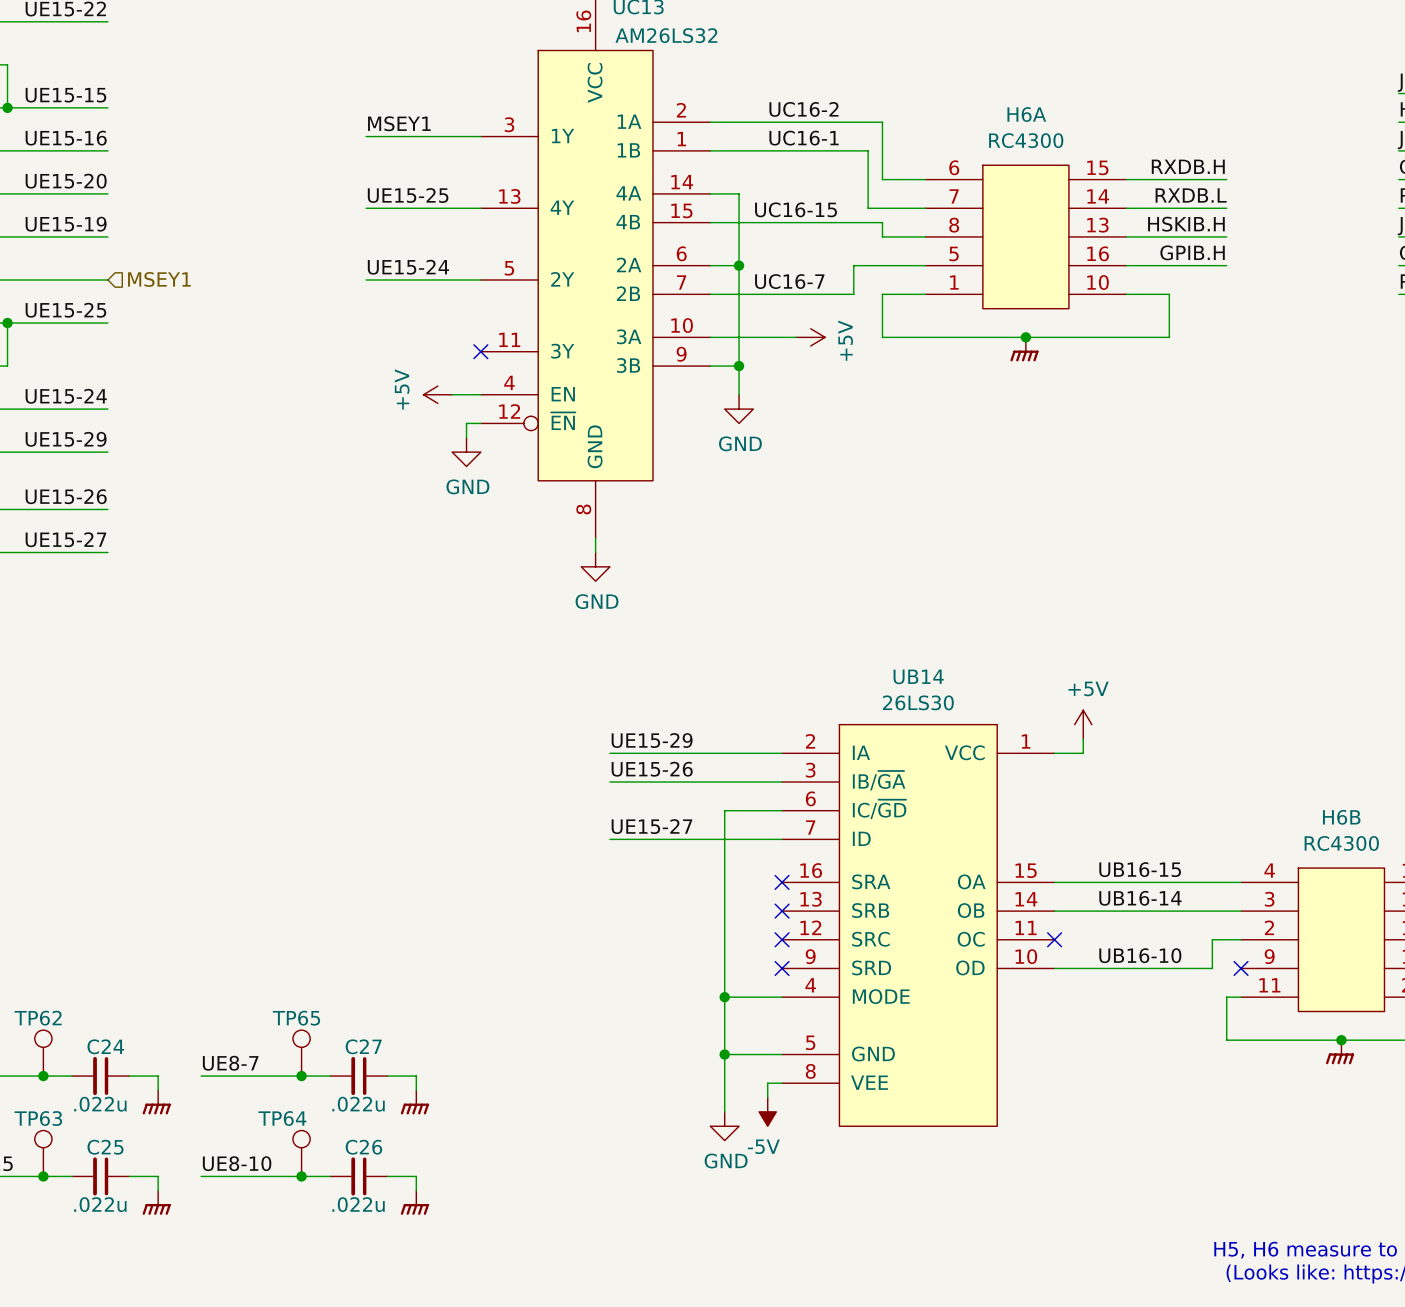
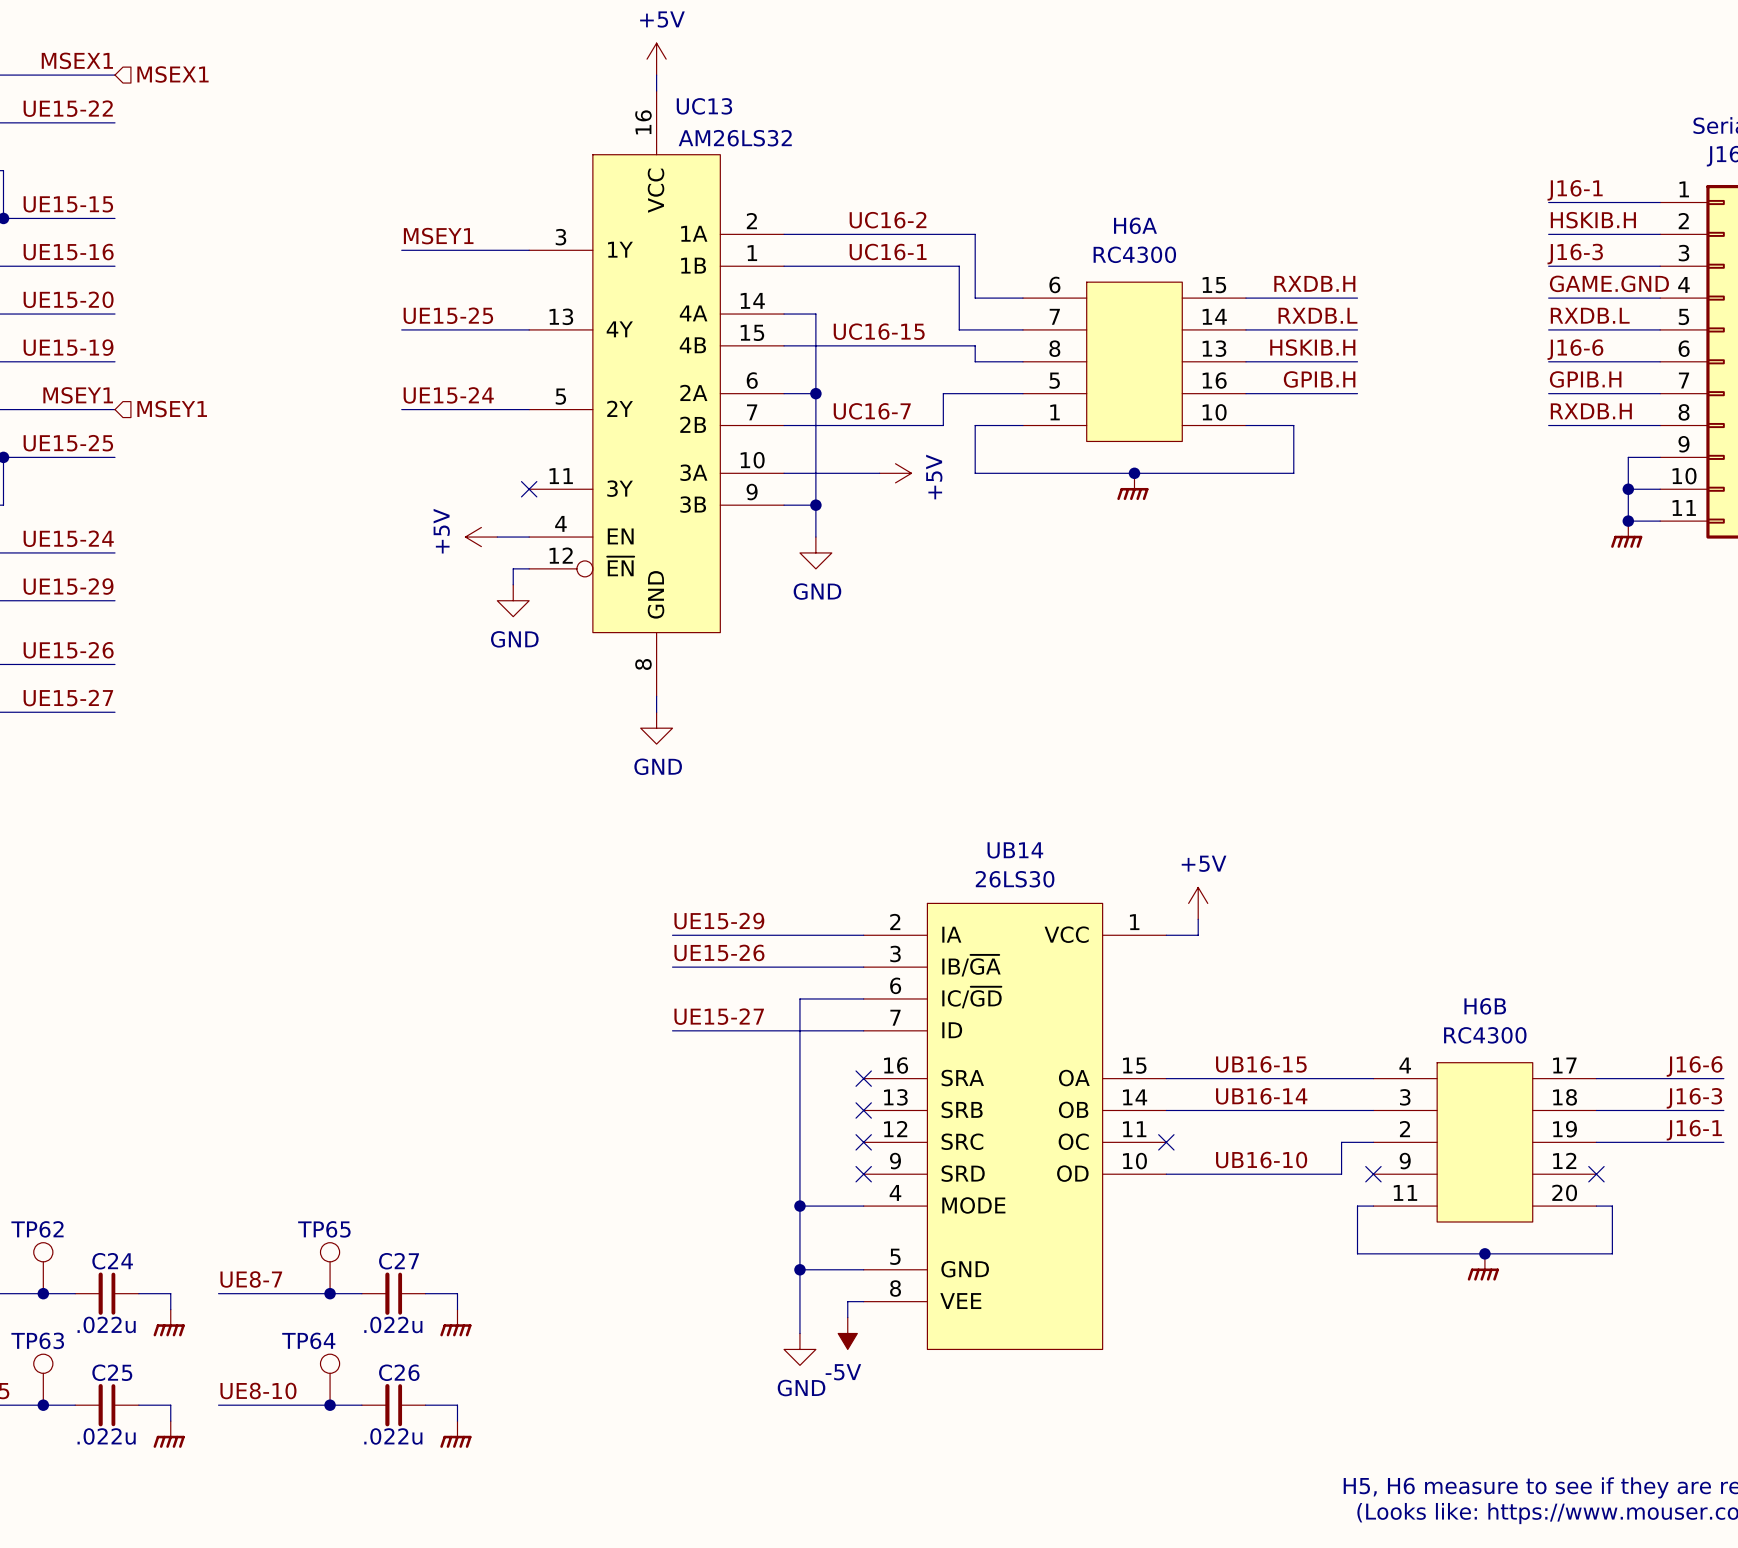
label: none -> MSEY1 (78, 395)

